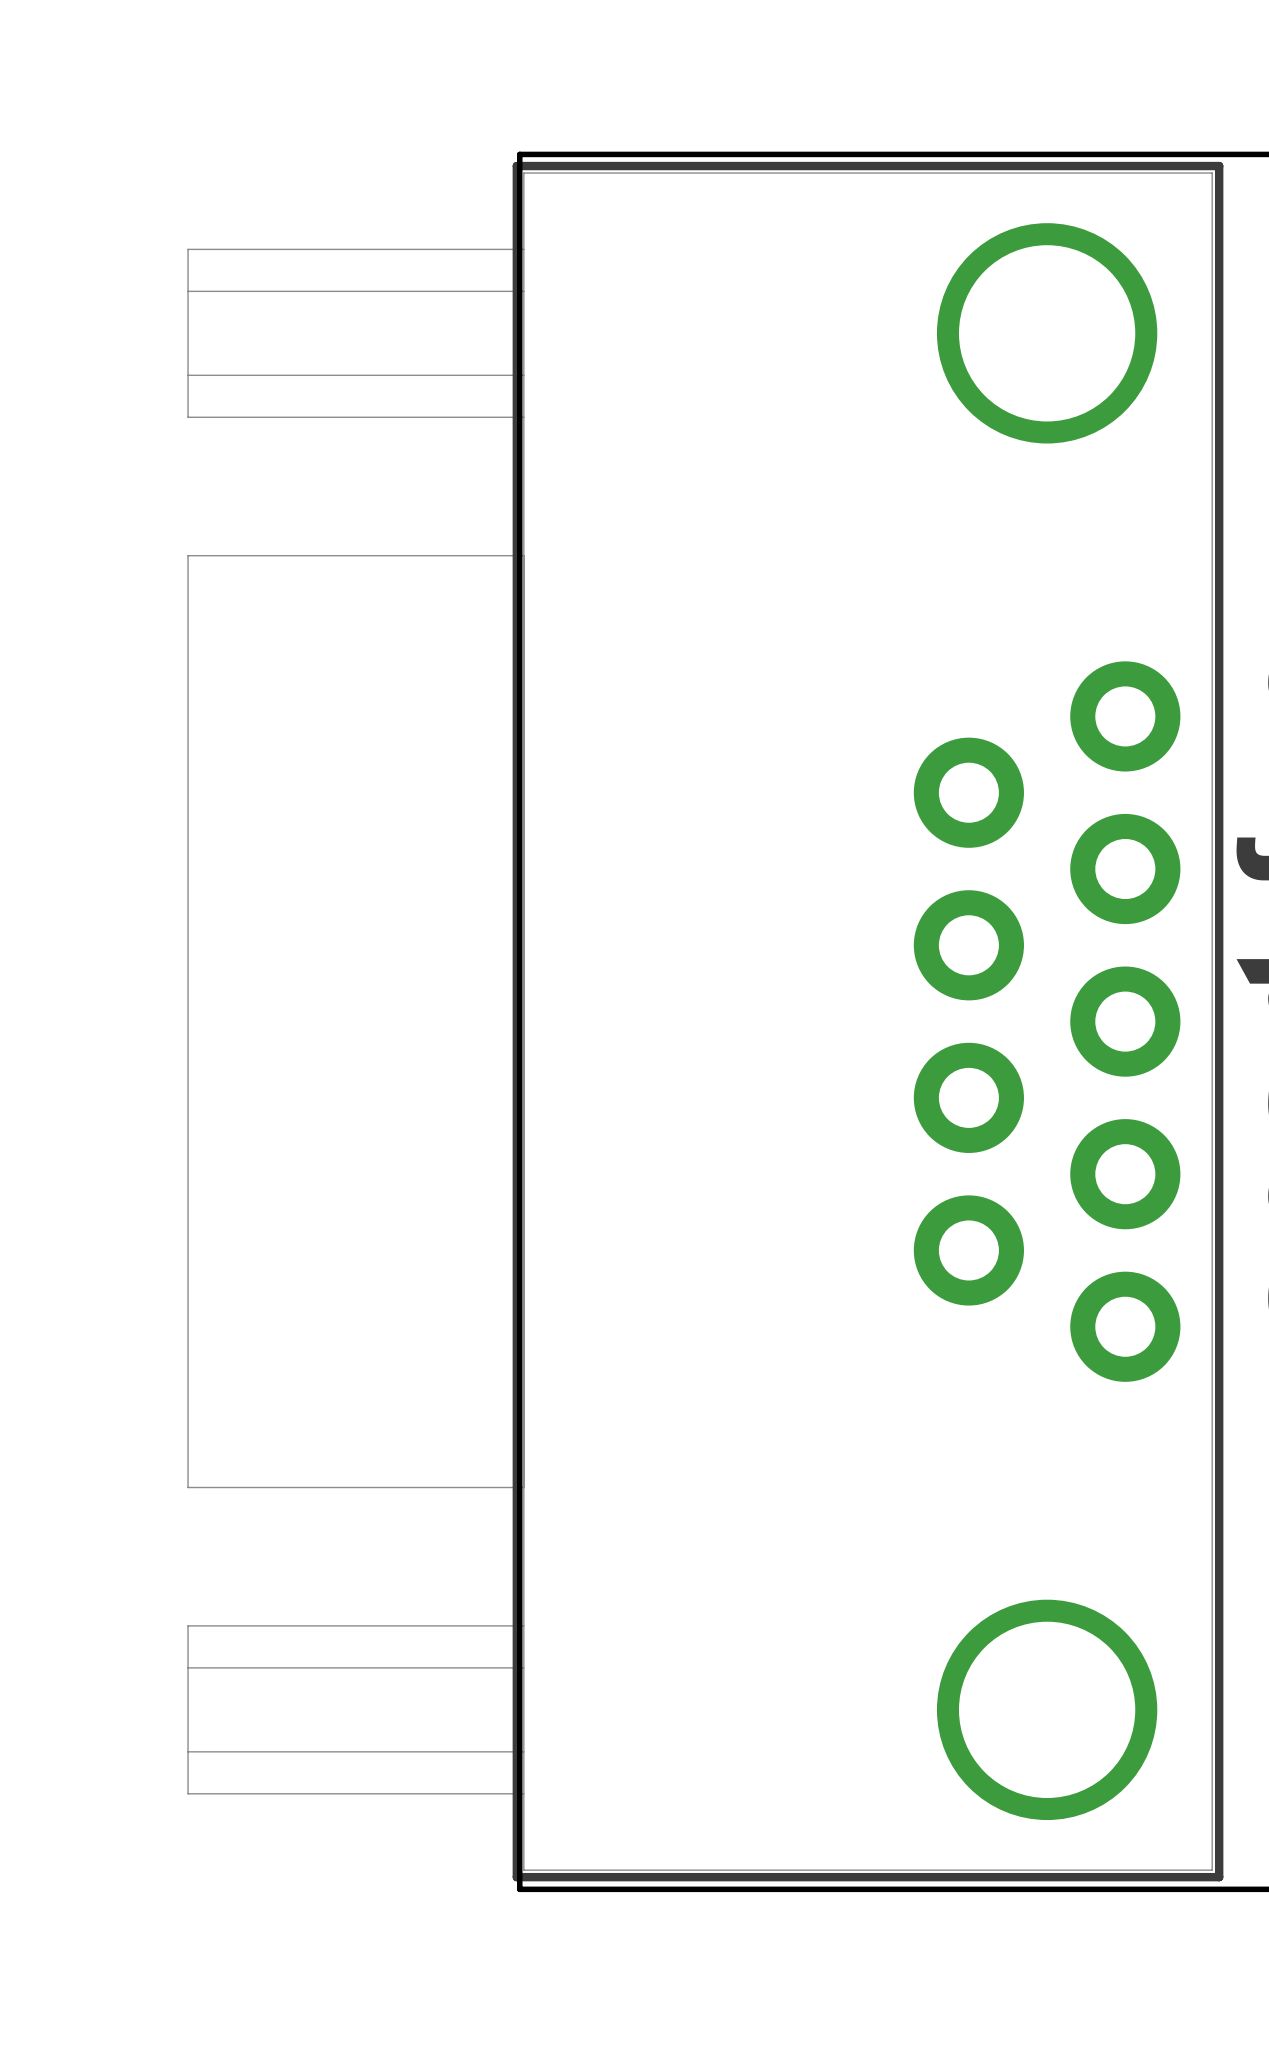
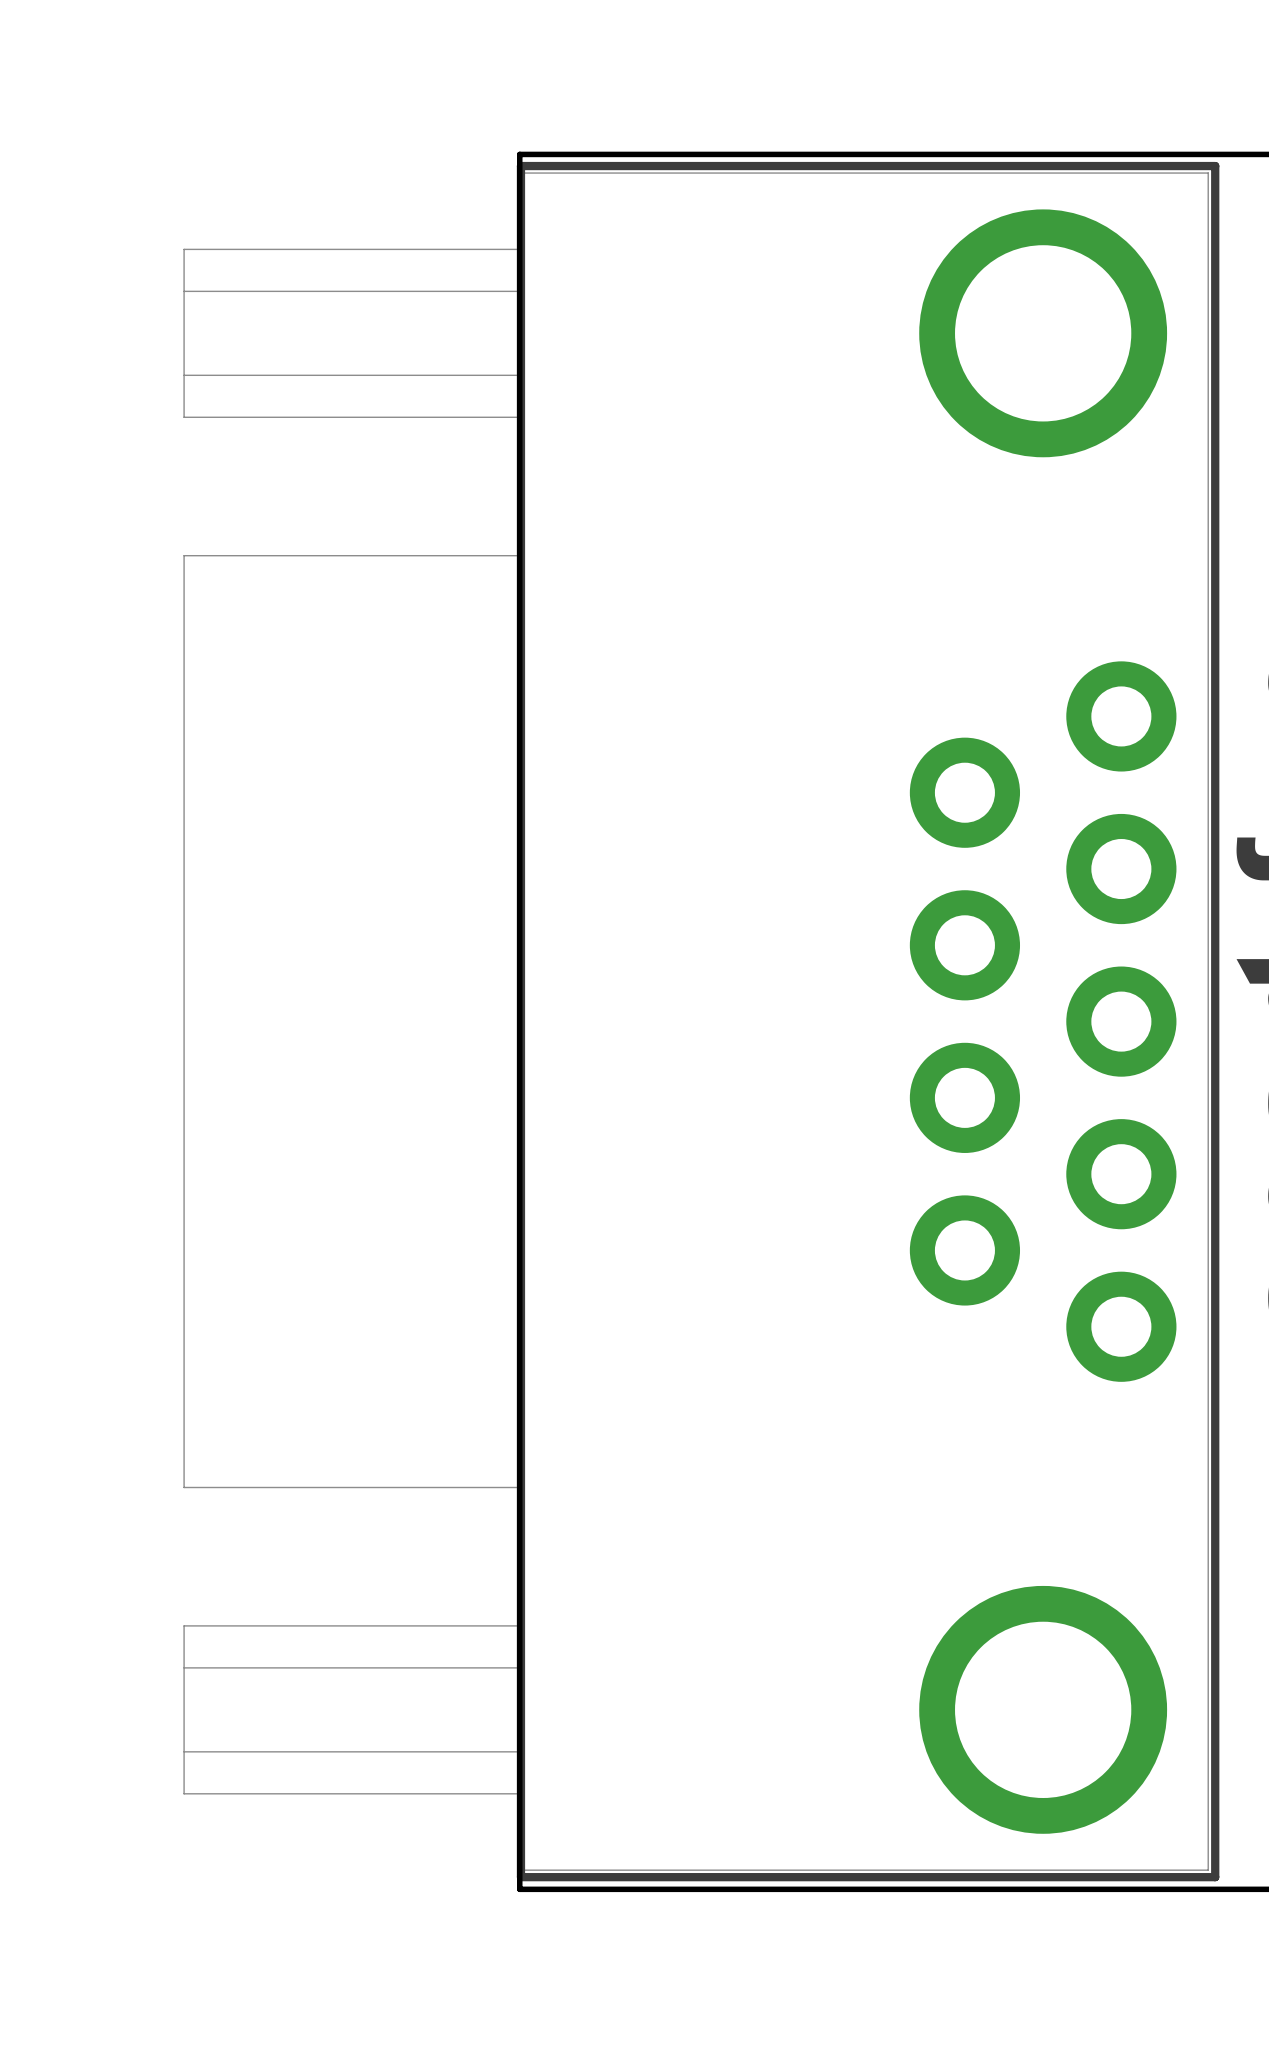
part footprint: [187, 161, 1224, 1882] -> [183, 161, 1220, 1882]

